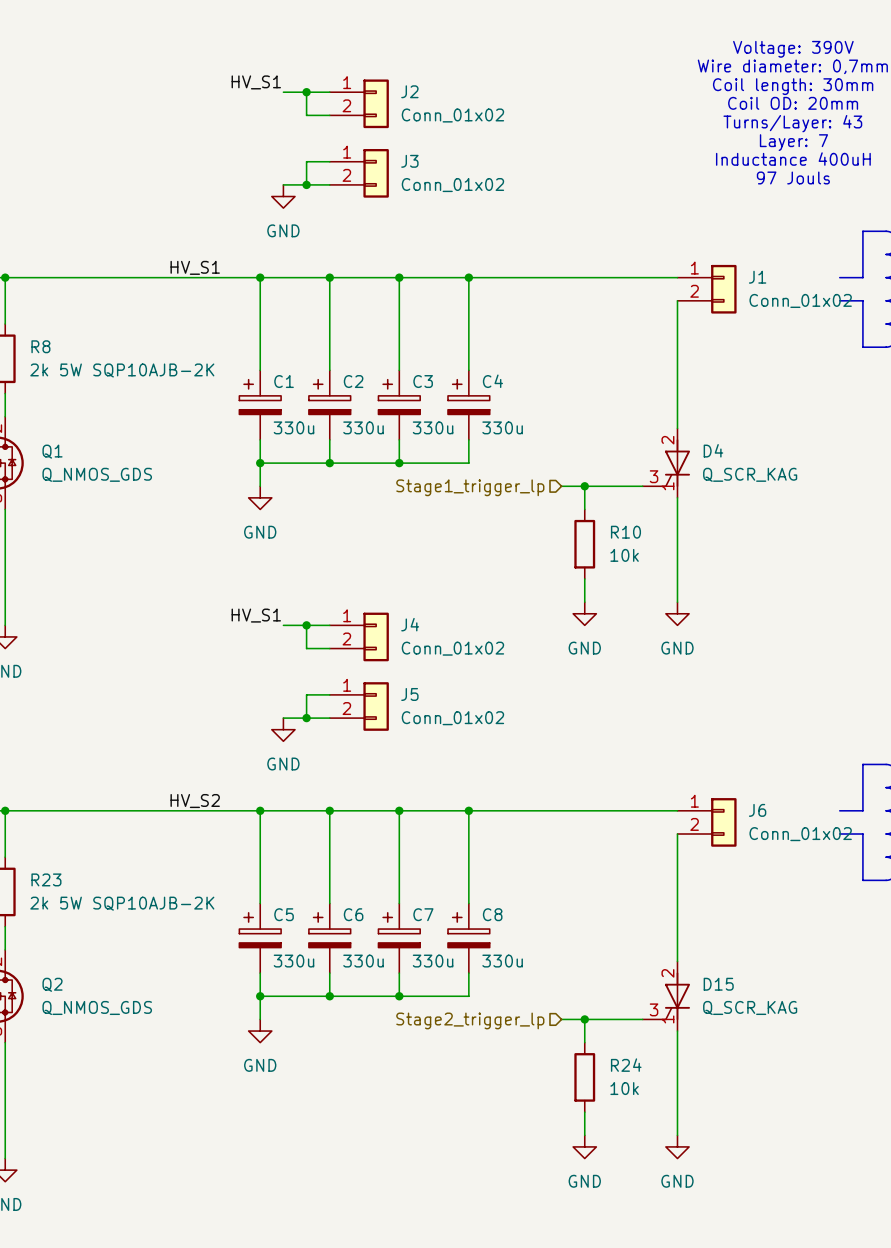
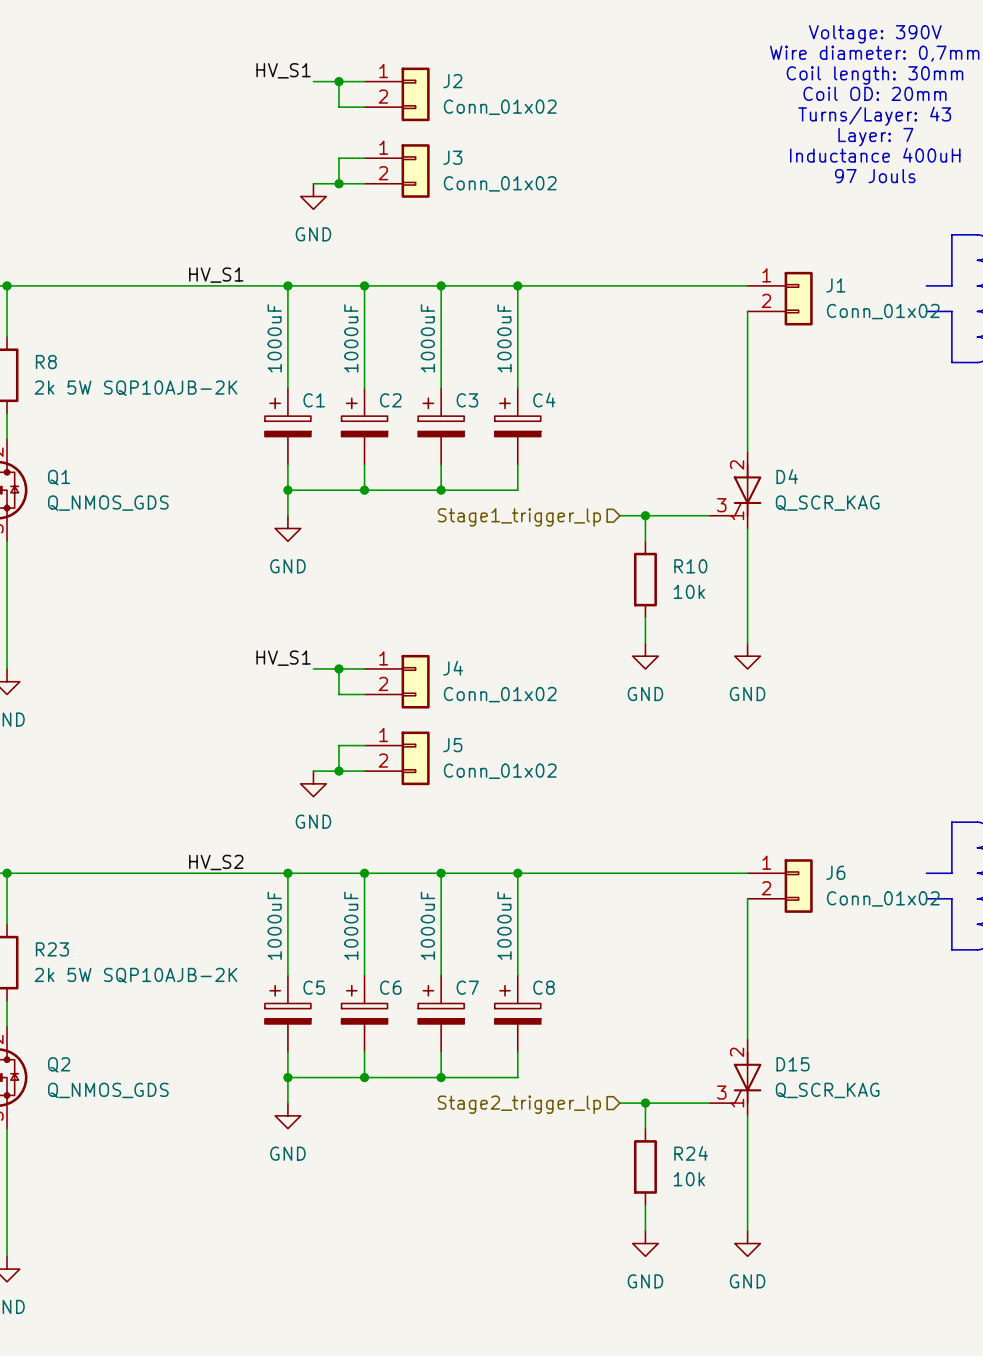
C1 value: 330u (293, 427) -> 1000uF (274, 338)
C2 value: 330u (363, 427) -> 1000uF (351, 338)
C3 value: 330u (433, 427) -> 1000uF (427, 338)
C4 value: 330u (502, 427) -> 1000uF (504, 338)
C5 value: 330u (293, 961) -> 1000uF (274, 925)
C6 value: 330u (363, 961) -> 1000uF (351, 925)
C7 value: 330u (433, 961) -> 1000uF (427, 925)
C8 value: 330u (502, 961) -> 1000uF (504, 925)

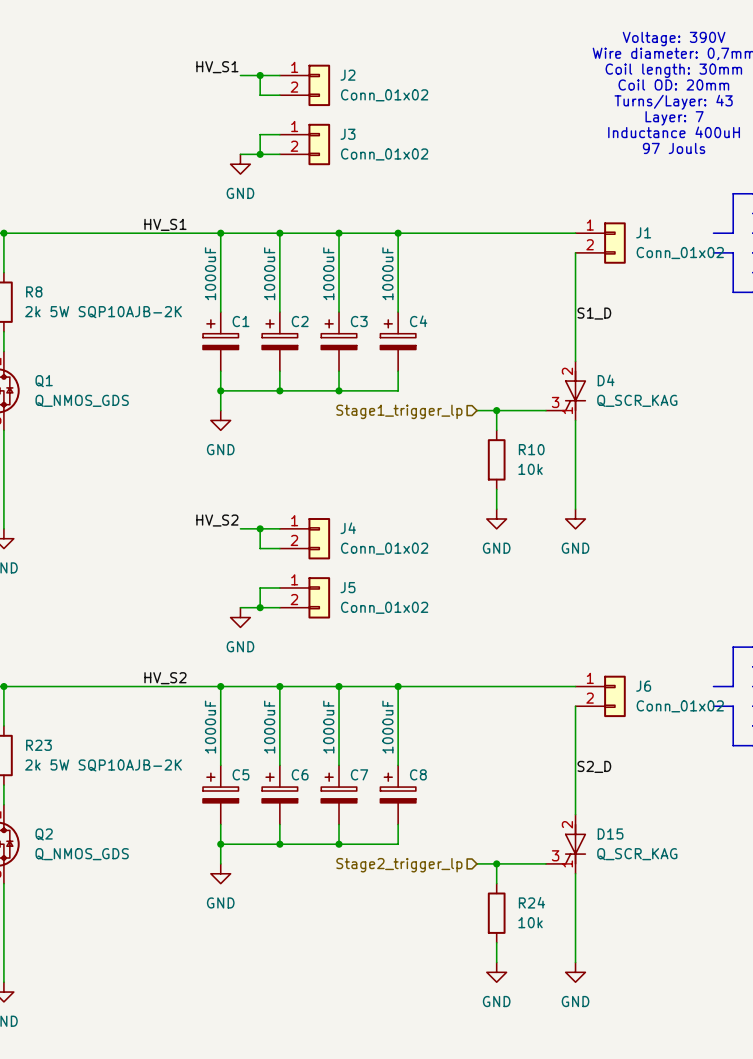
label: none -> S1_D (594, 313)
label: HV_S1 (283, 658) -> HV_S2 (217, 520)
label: none -> S2_D (594, 766)

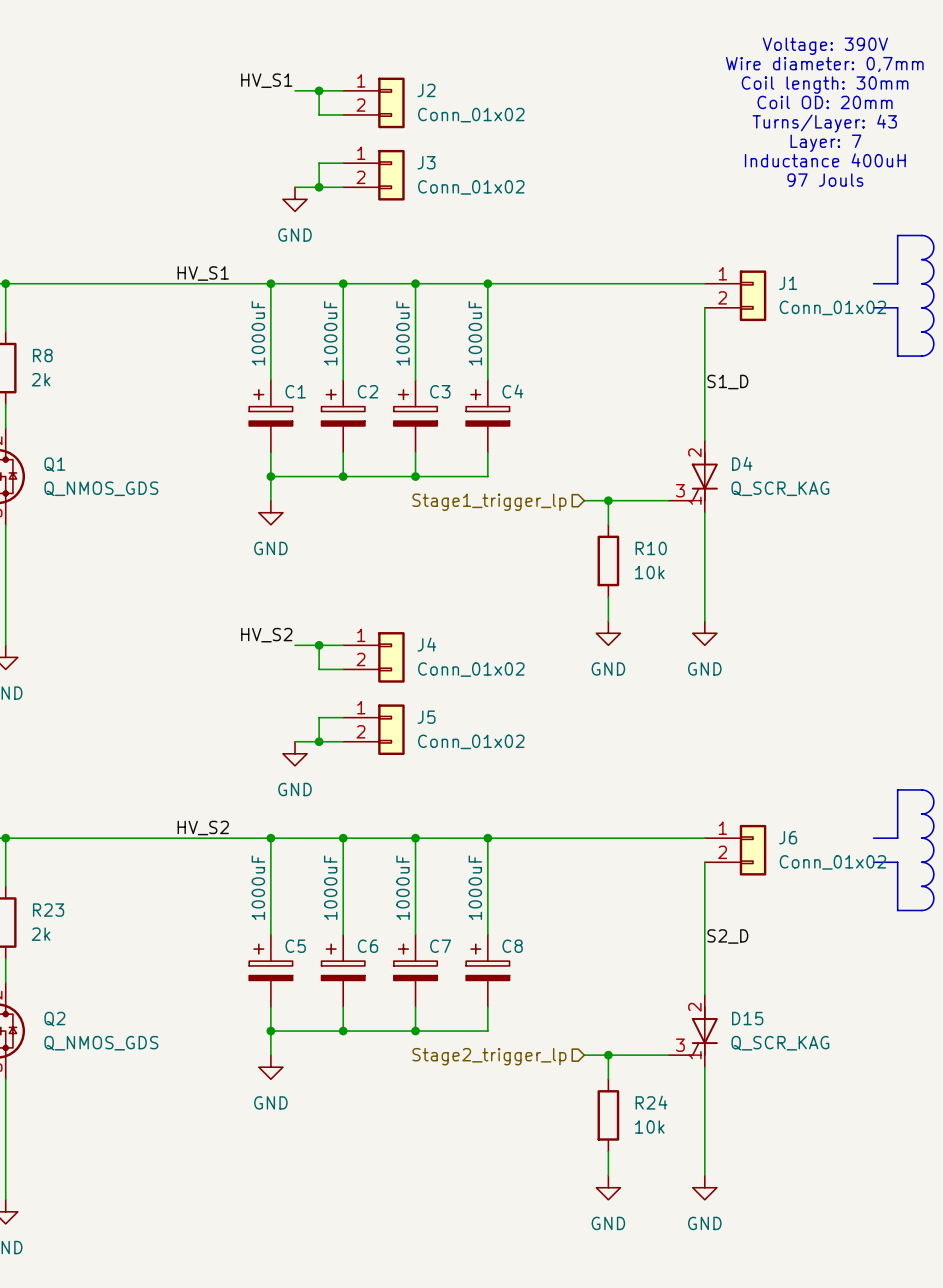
R8 value: 2k 5W SQP10AJB-2K (103, 312) -> 2k (41, 379)
R23 value: 2k 5W SQP10AJB-2K (103, 765) -> 2k (41, 934)

